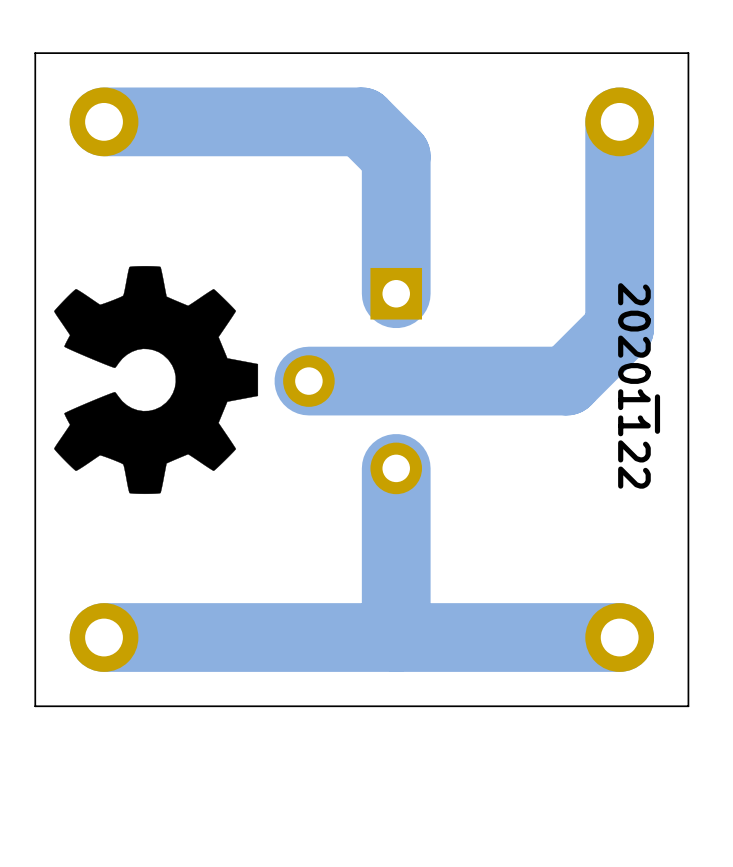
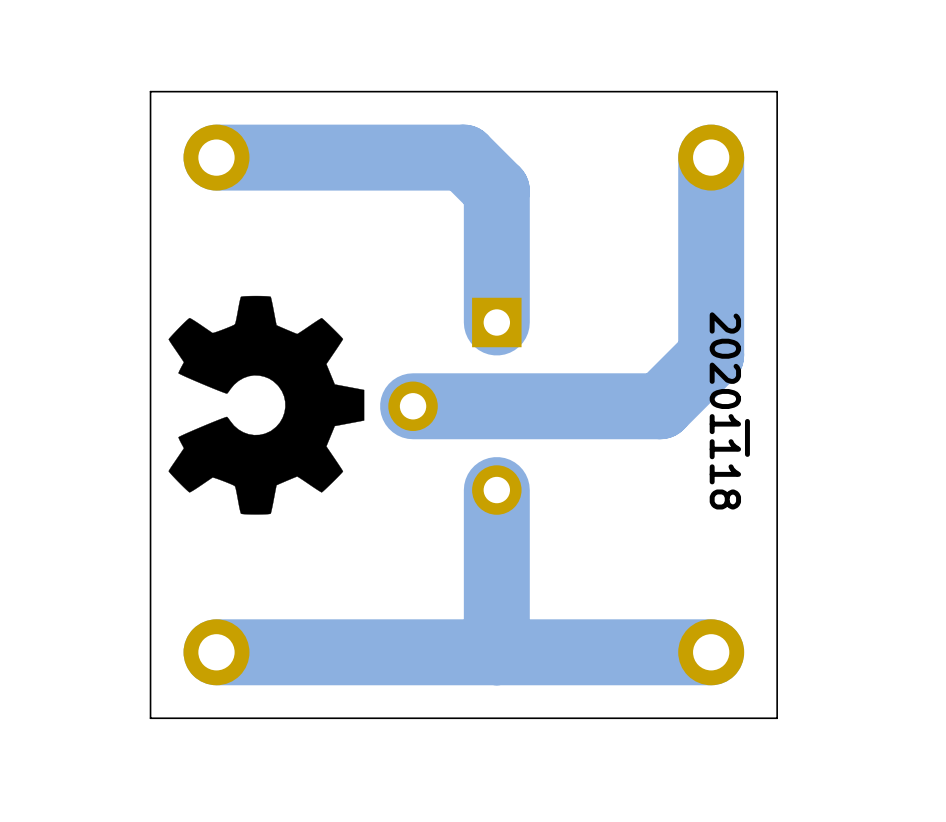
drawing shape: [618, 283, 661, 489] -> [709, 312, 750, 510]

